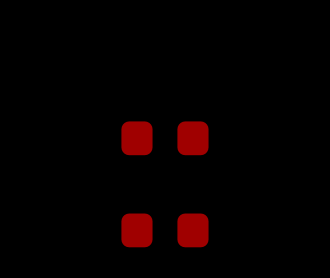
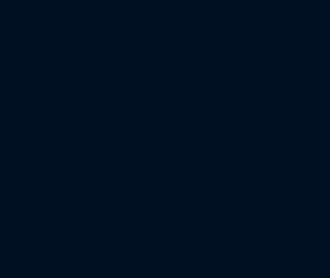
part: (164, 138) -> none
part: (164, 230) -> none

